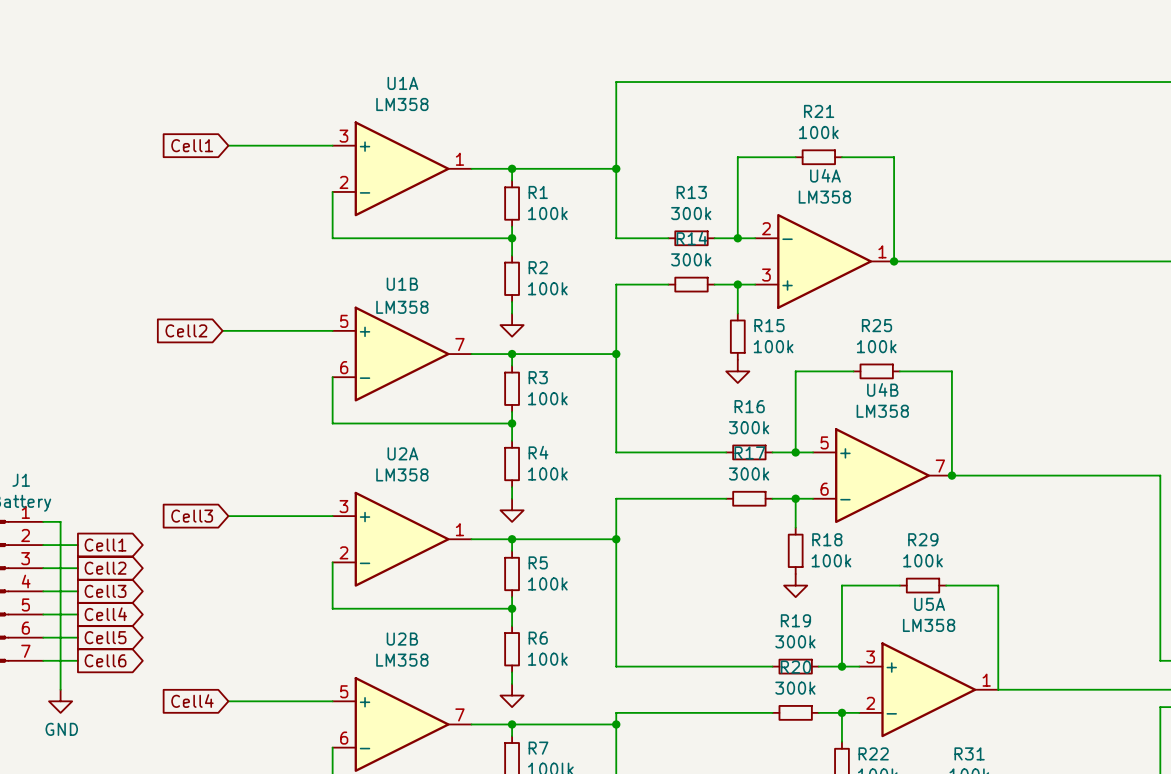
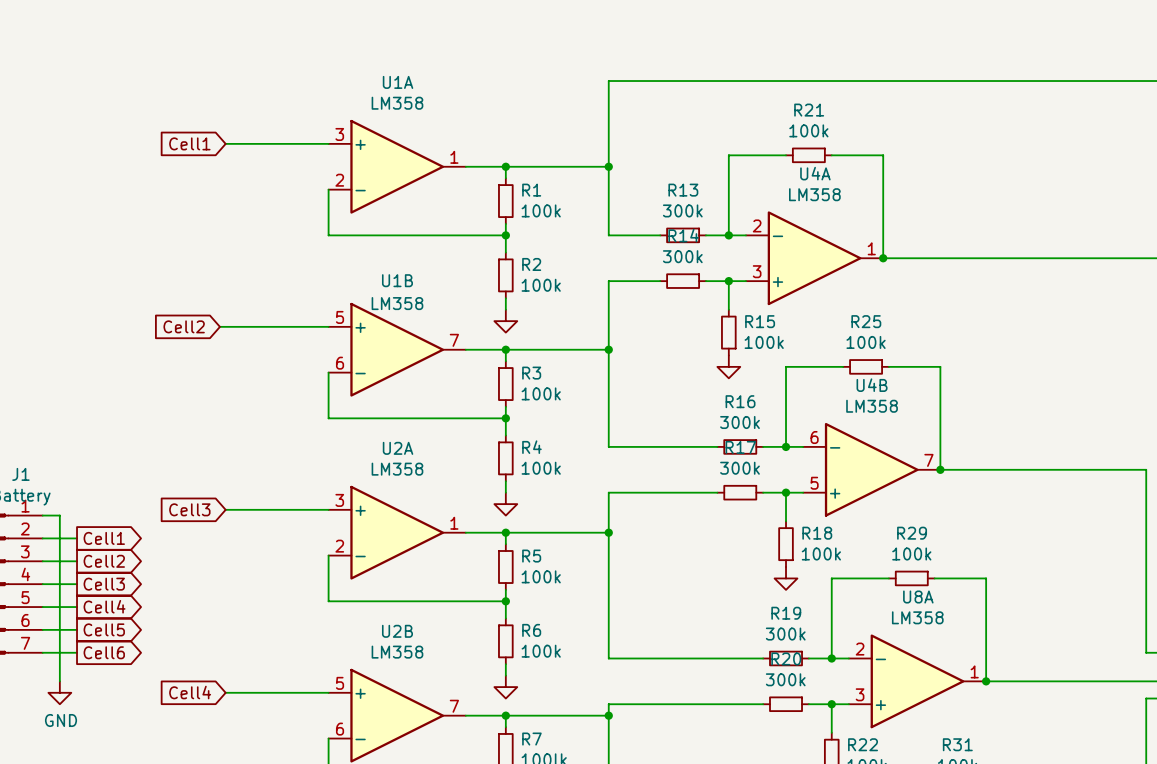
U4B flip: as is (882, 475) -> up-down (871, 469)
U5A name: U5A (929, 604) -> U8A (918, 597)
U5A flip: as is (928, 689) -> up-down (917, 681)
junction: none -> (986, 681)

